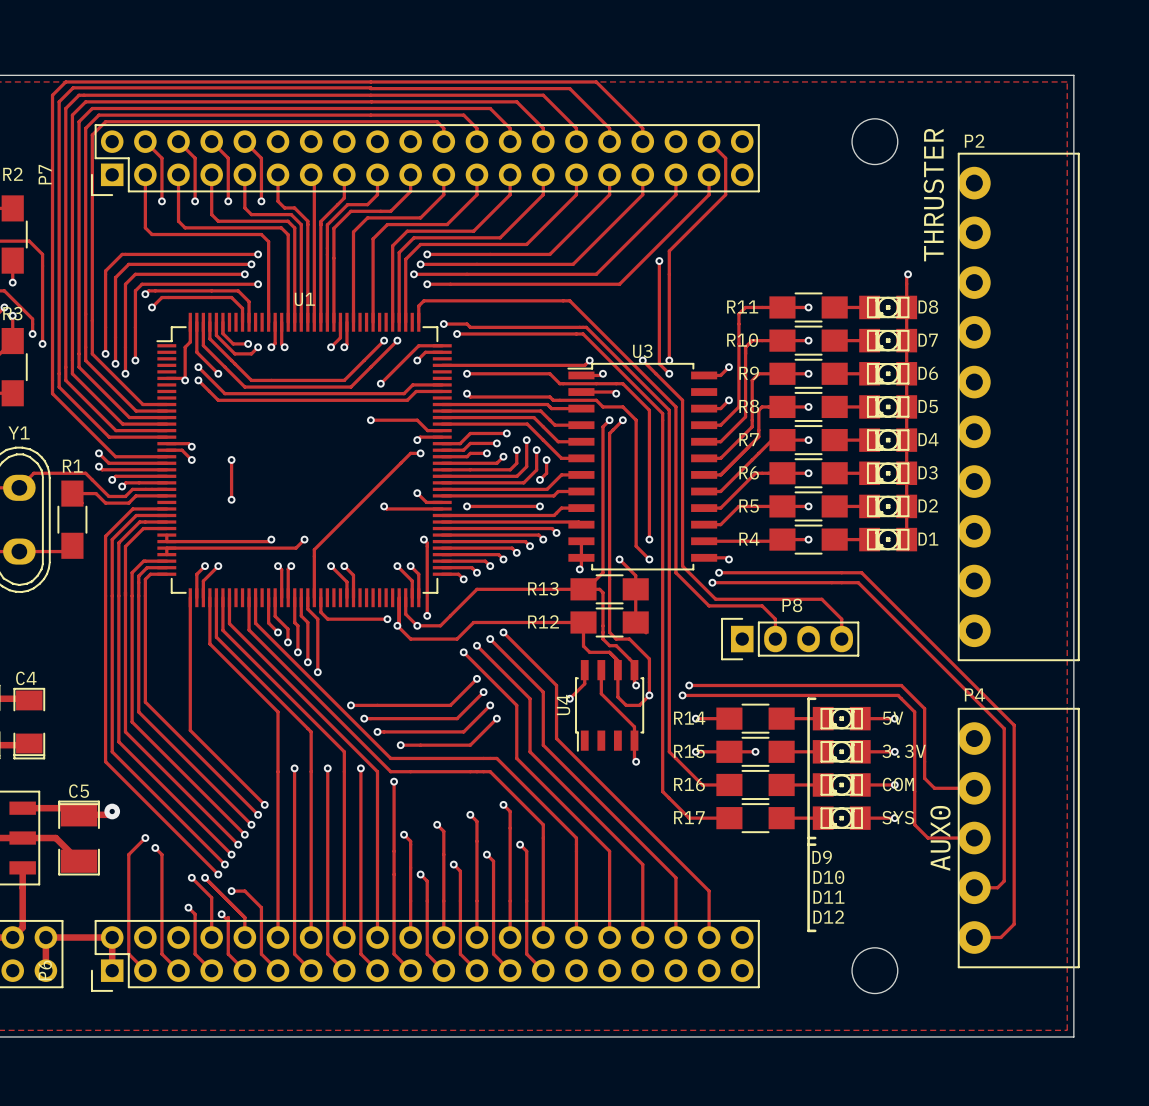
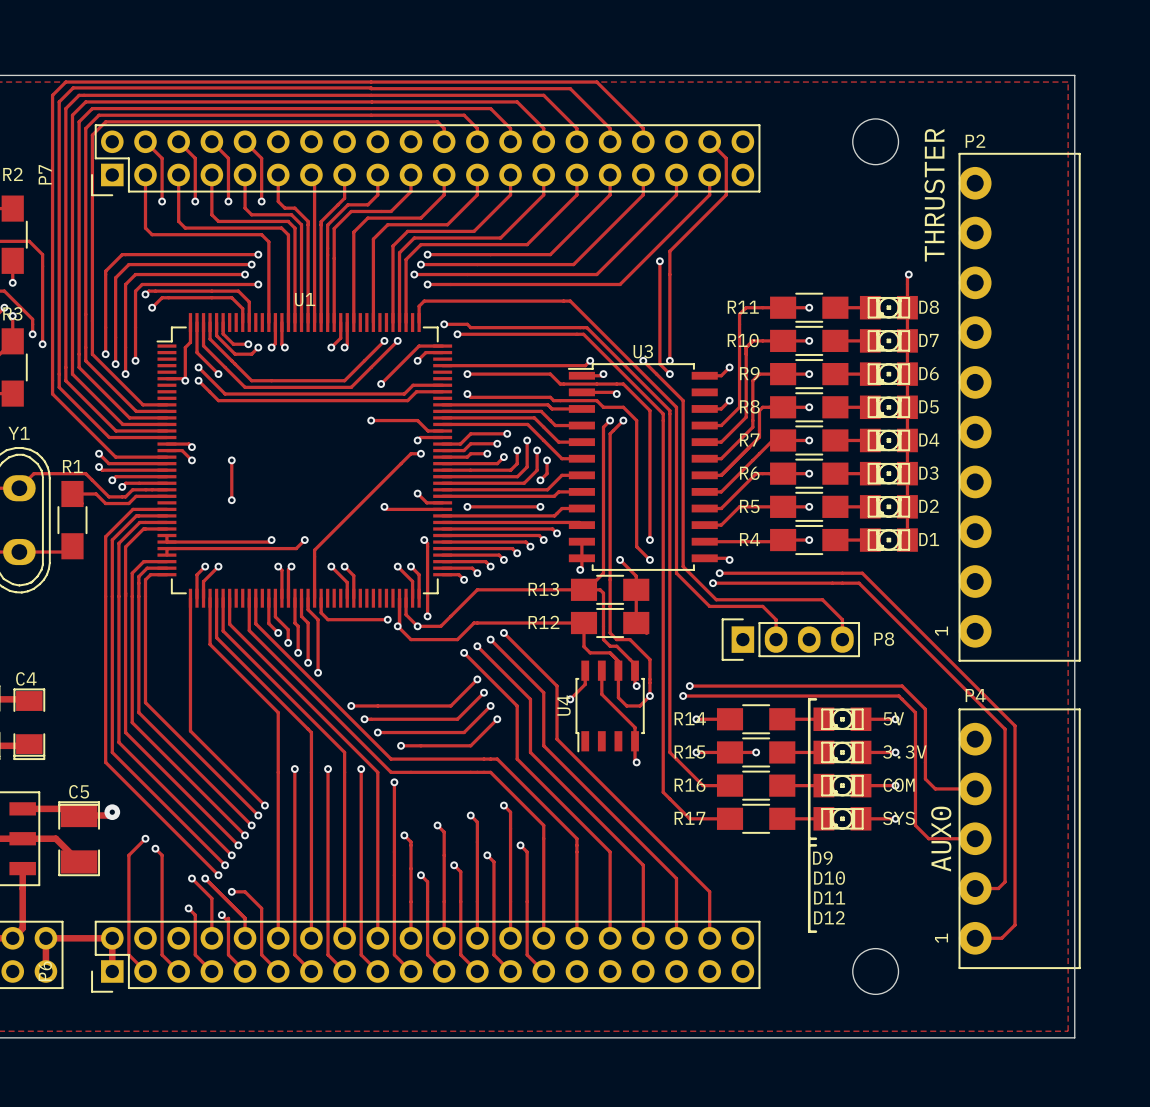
P8 name position: P8 (792, 605) -> P8 (884, 639)
text: none -> 1 (941, 631)
text: none -> 1 (941, 938)

